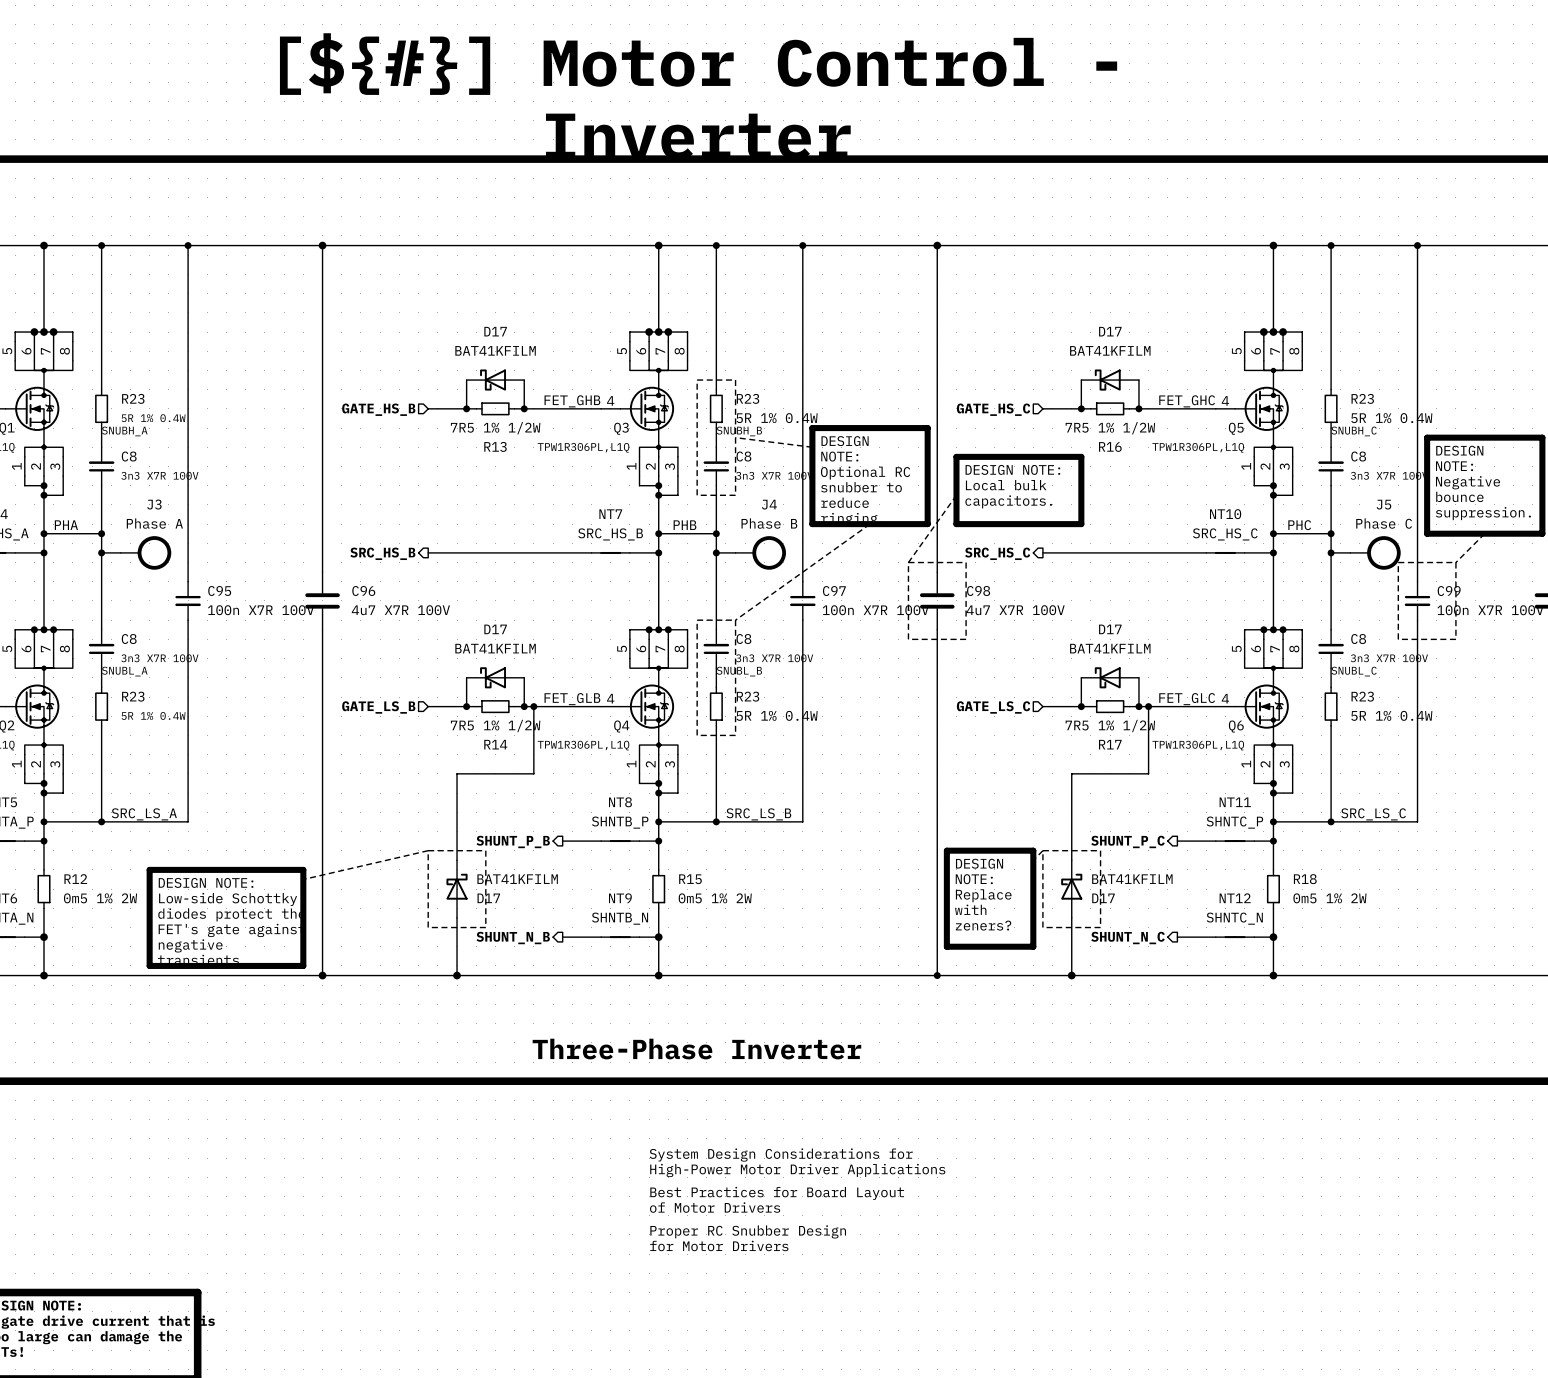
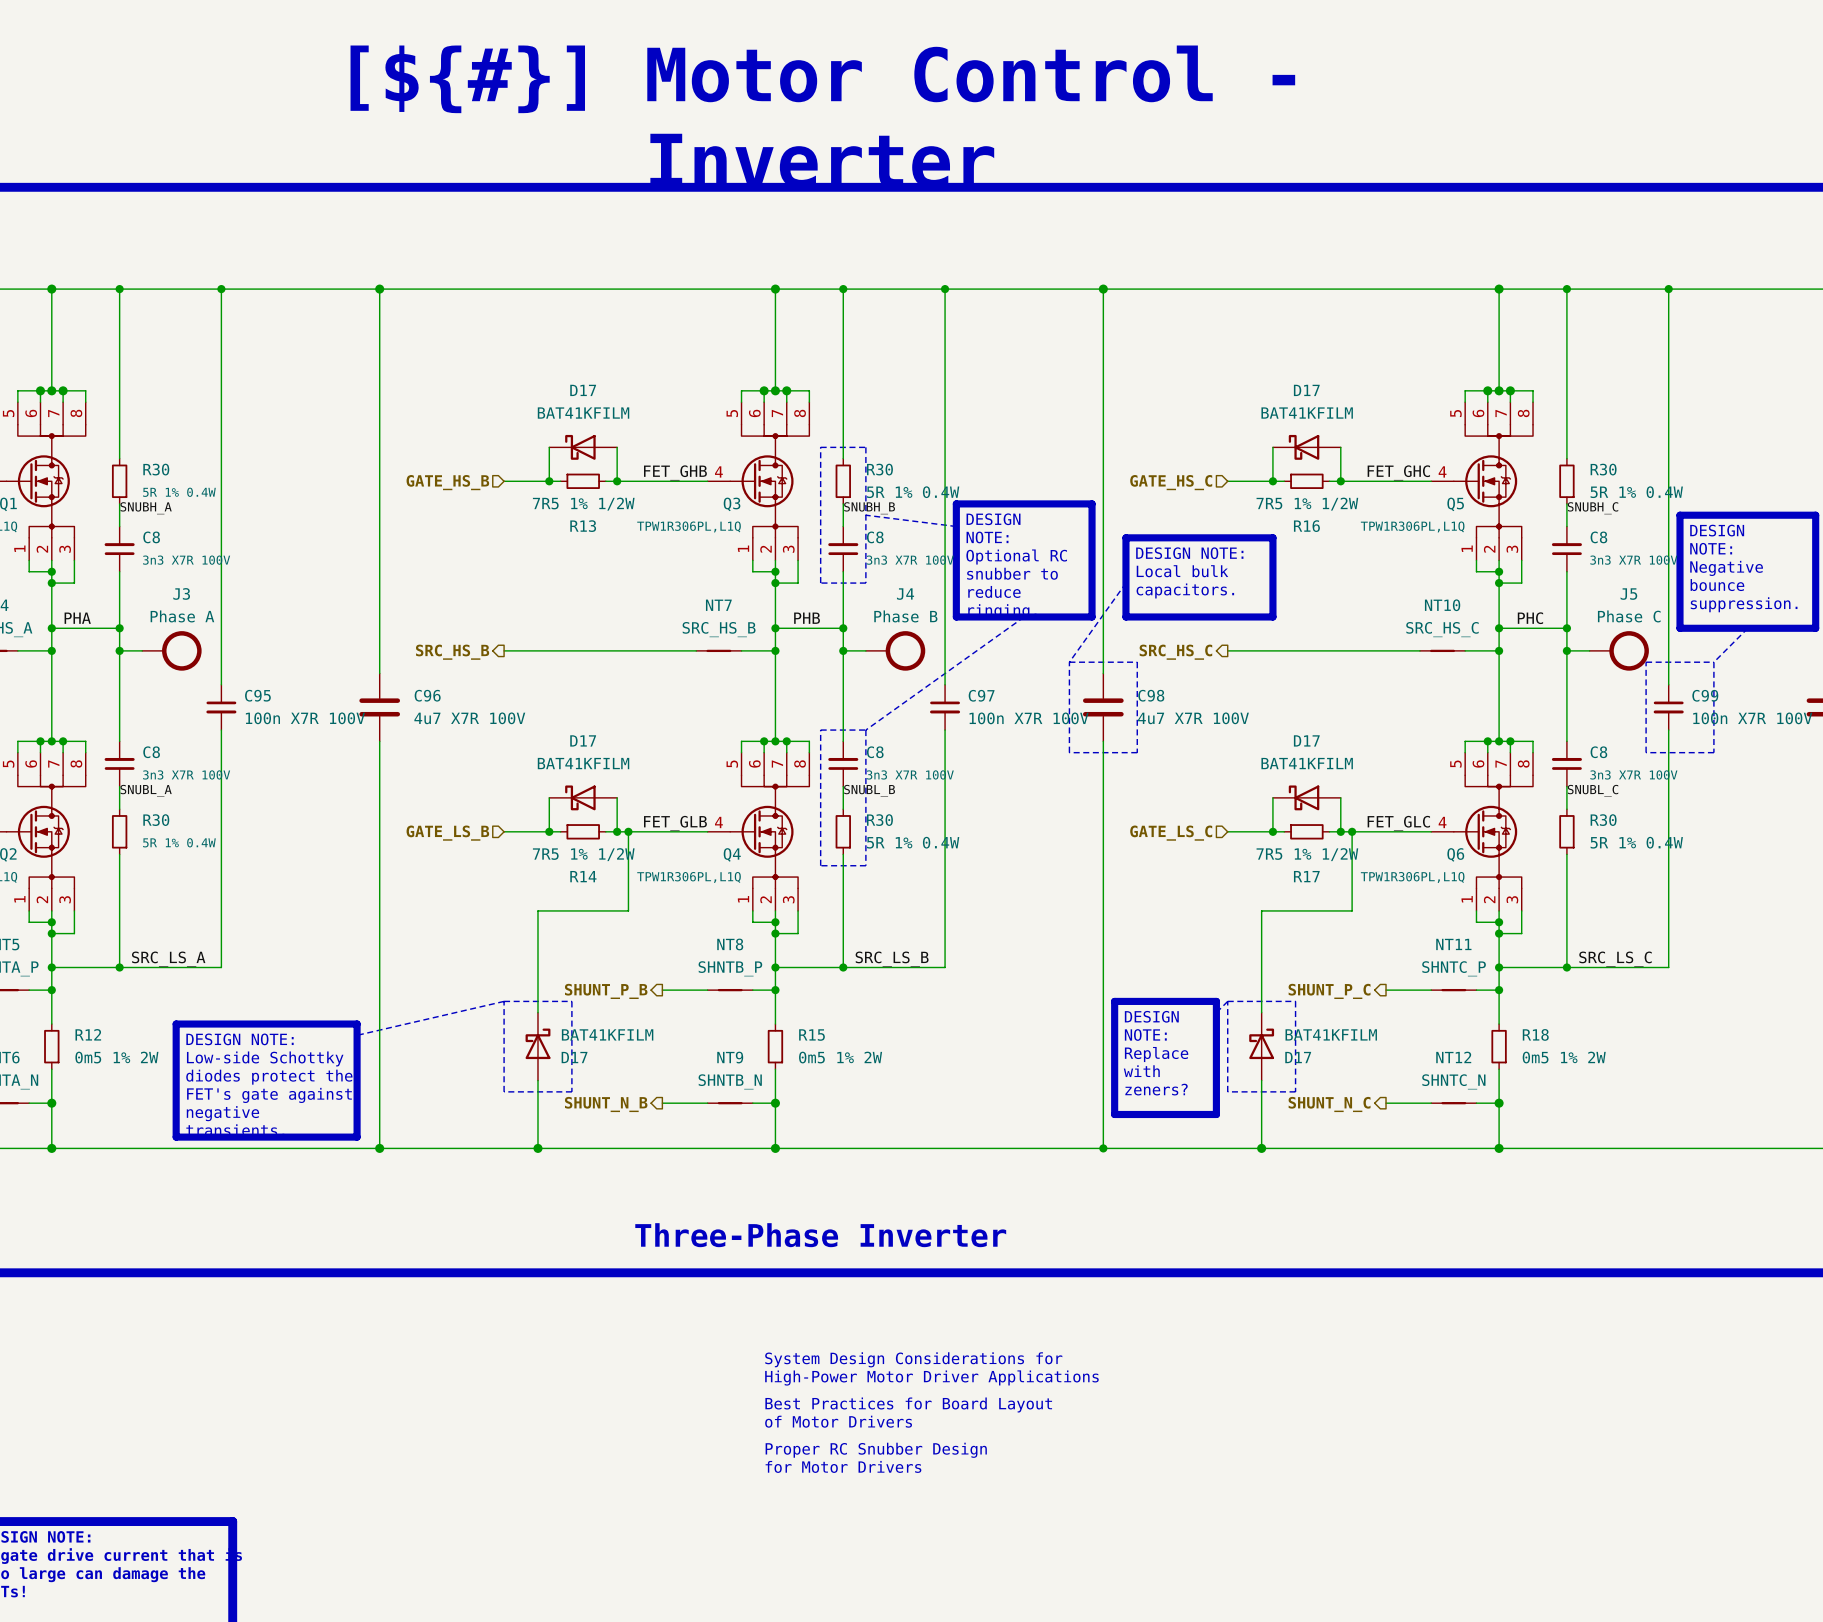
R23 name: R23 (133, 398) -> R30 (156, 469)
R23 name: R23 (748, 398) -> R30 (879, 469)
R23 name: R23 (1362, 398) -> R30 (1603, 469)
R23 name: R23 (133, 696) -> R30 (156, 820)
R23 name: R23 (748, 696) -> R30 (879, 820)
R23 name: R23 (1362, 696) -> R30 (1603, 820)

